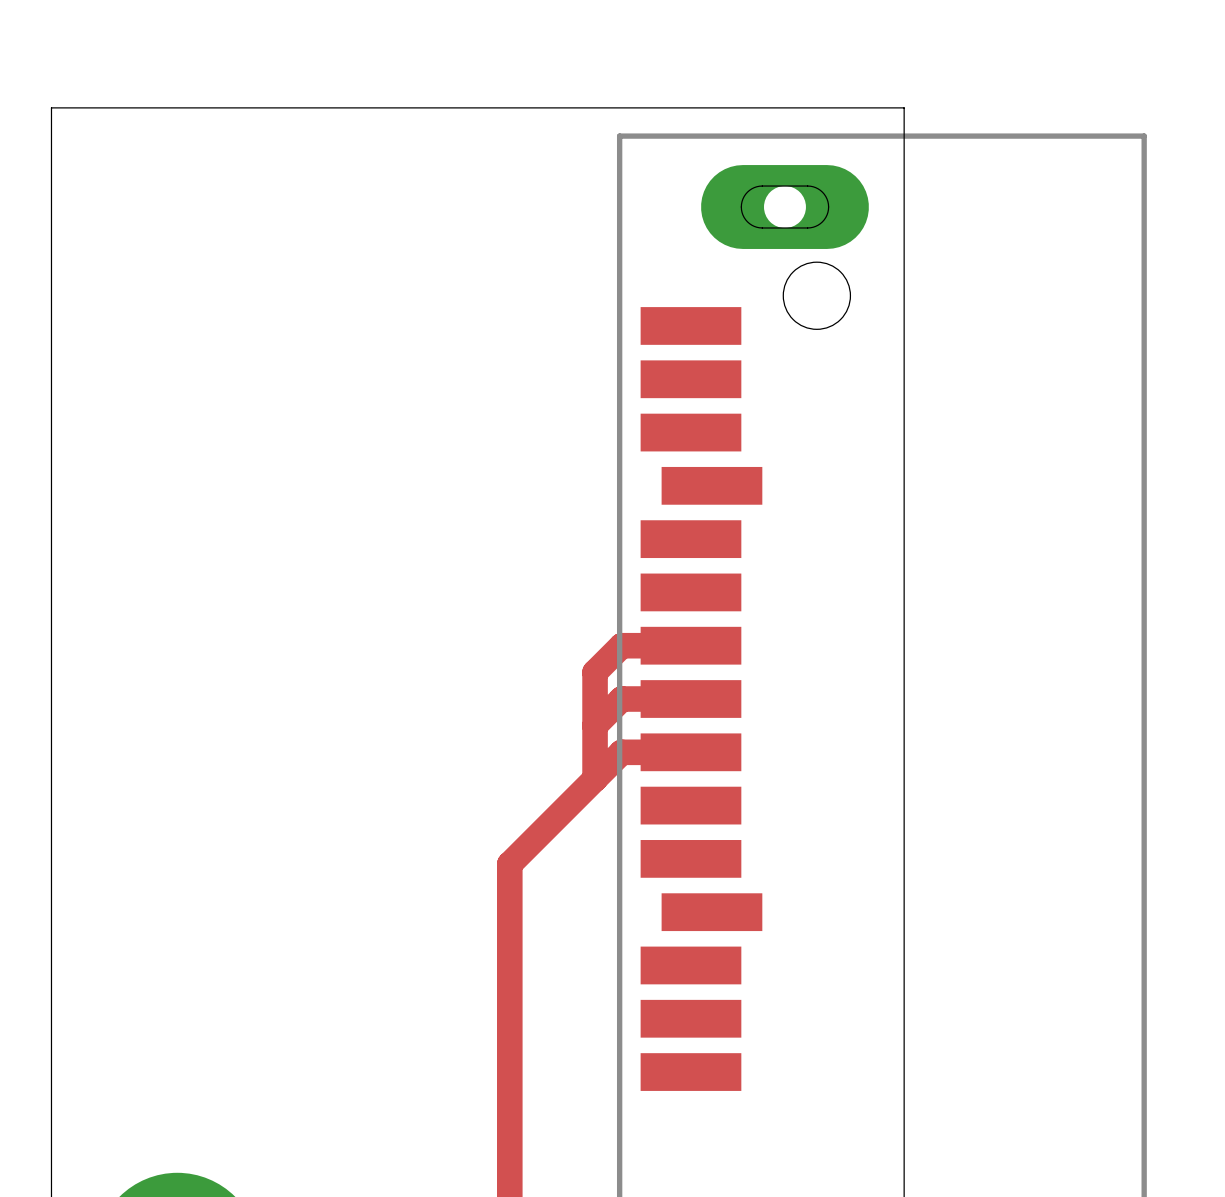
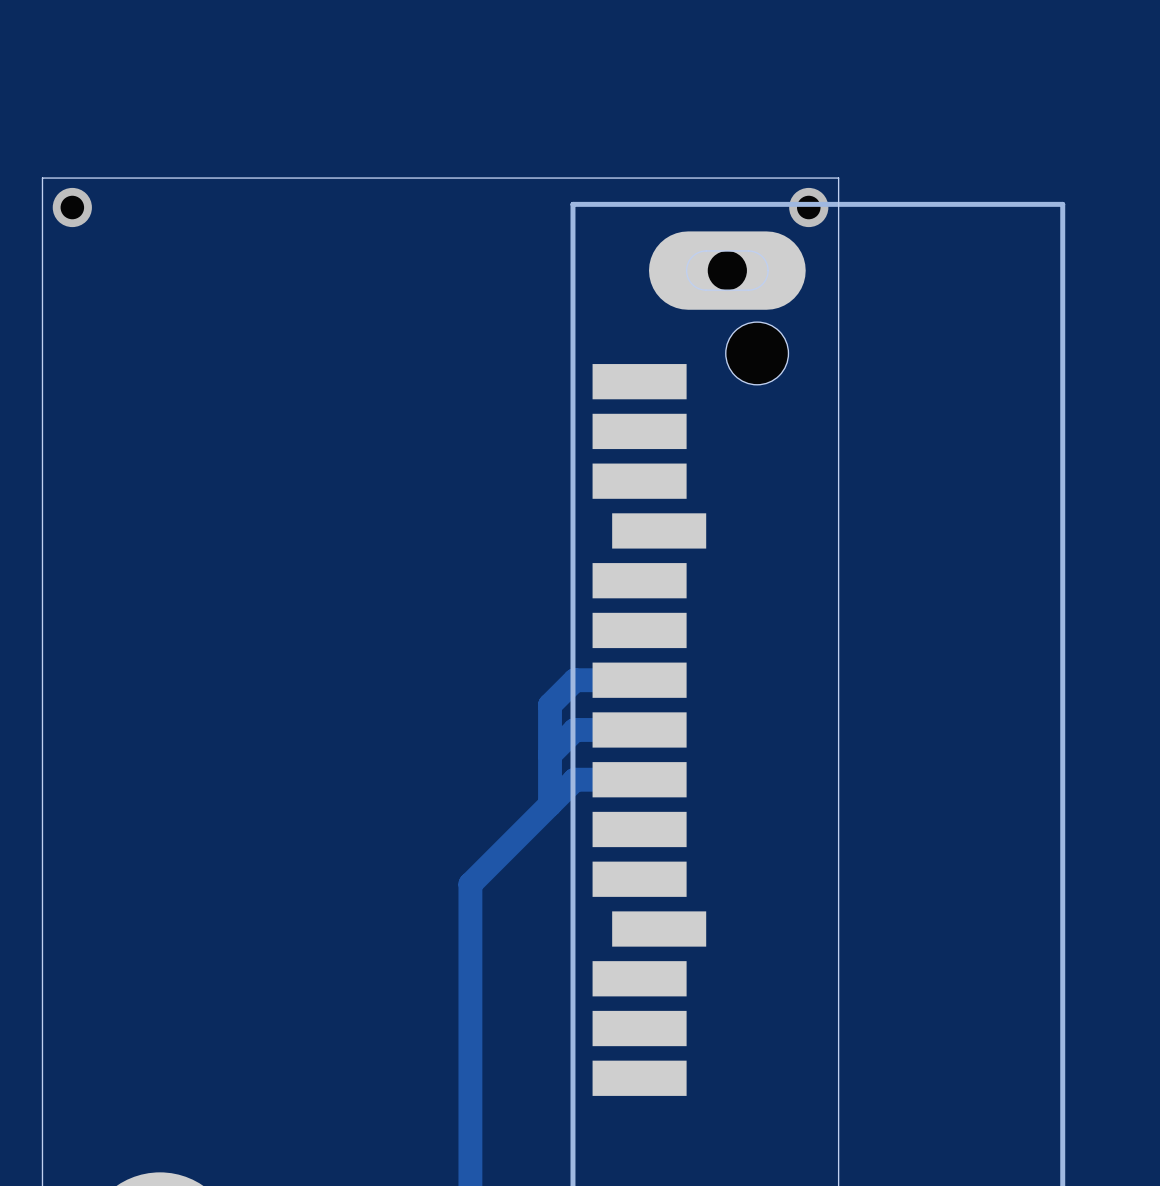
via: none -> (72, 207)
via: none -> (808, 207)

